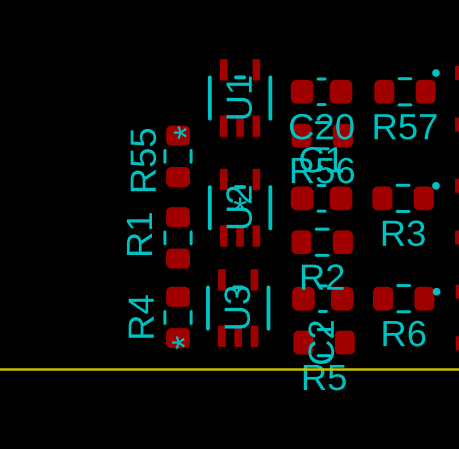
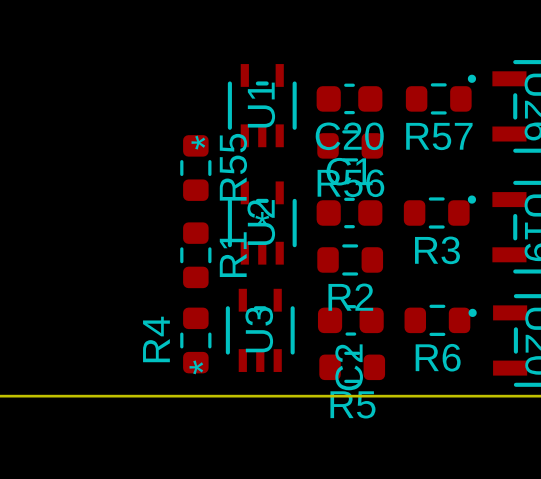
R55 name position: R55 (143, 160) -> R55 (233, 167)
R1 name position: R1 (139, 234) -> R1 (233, 254)

